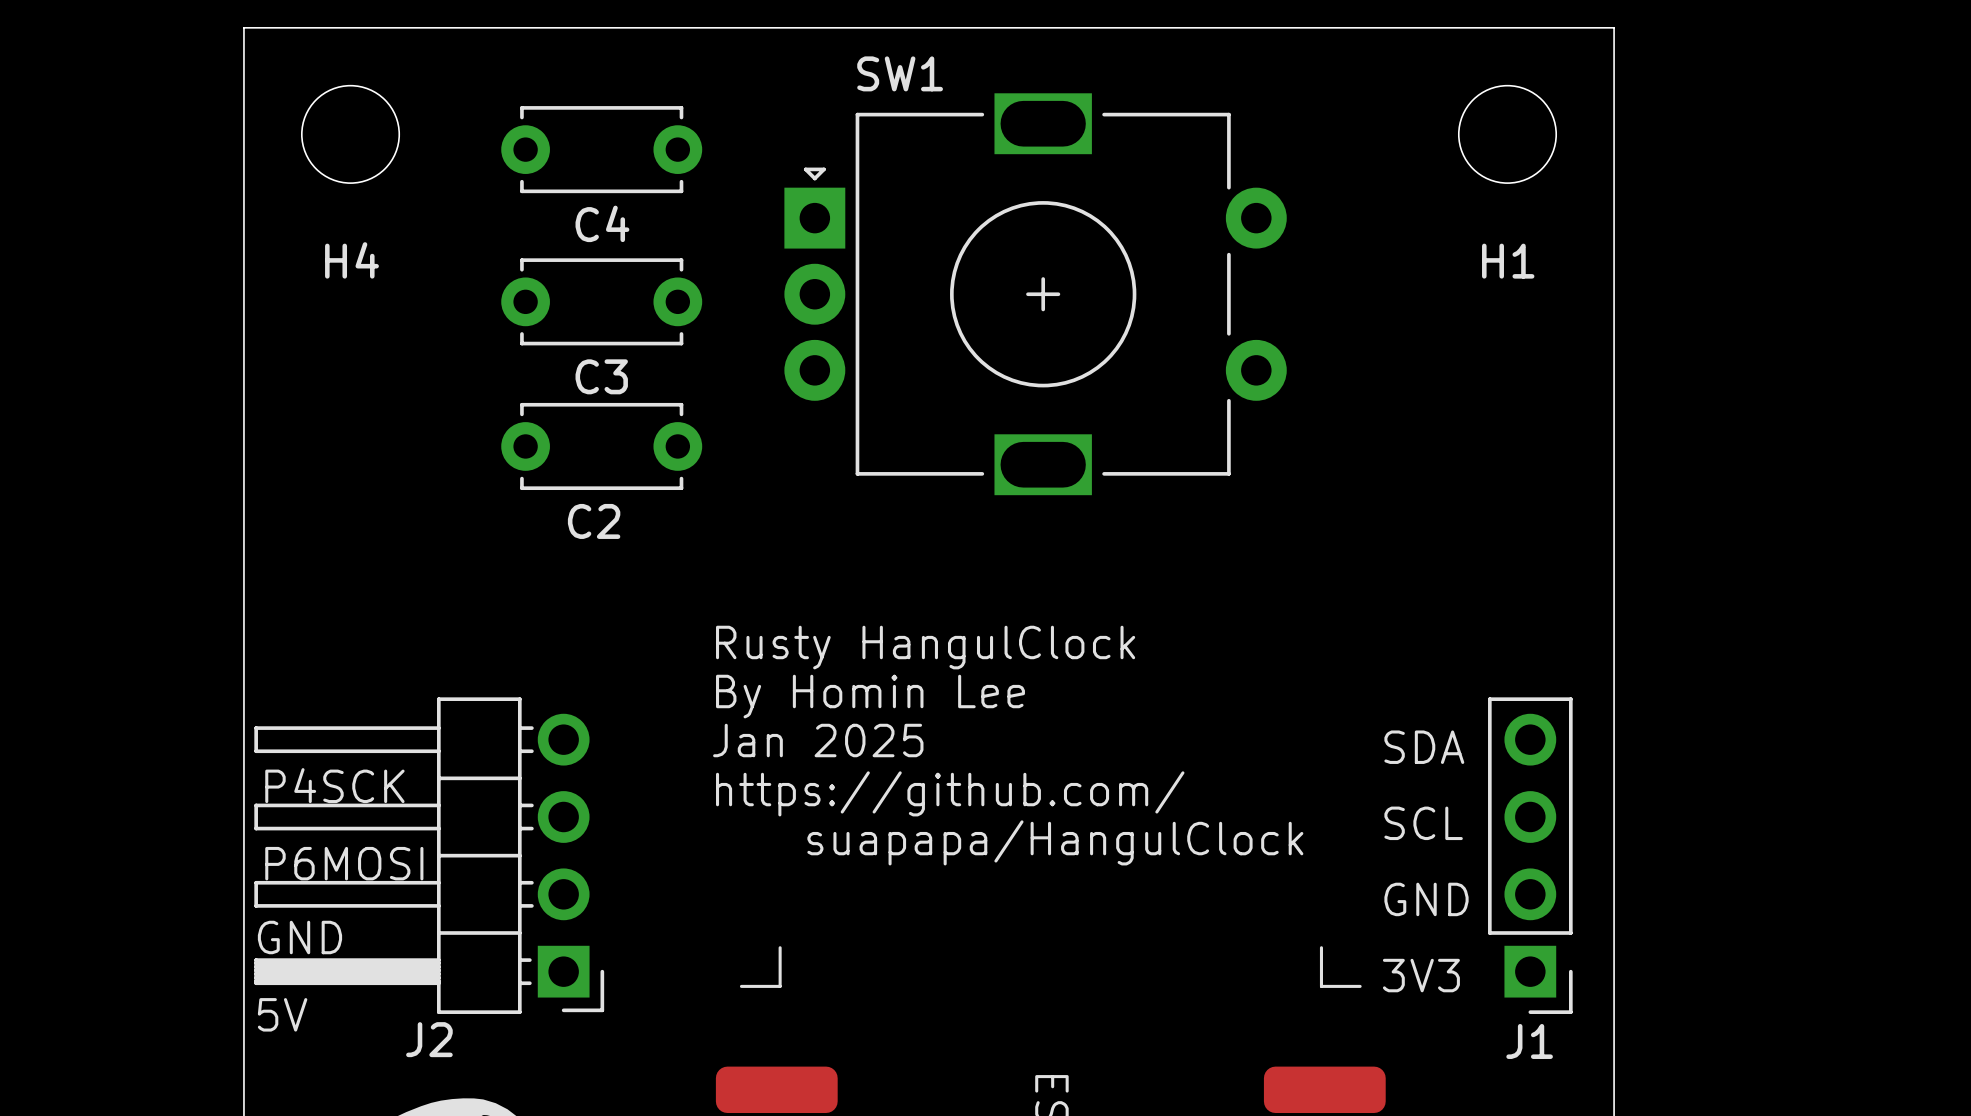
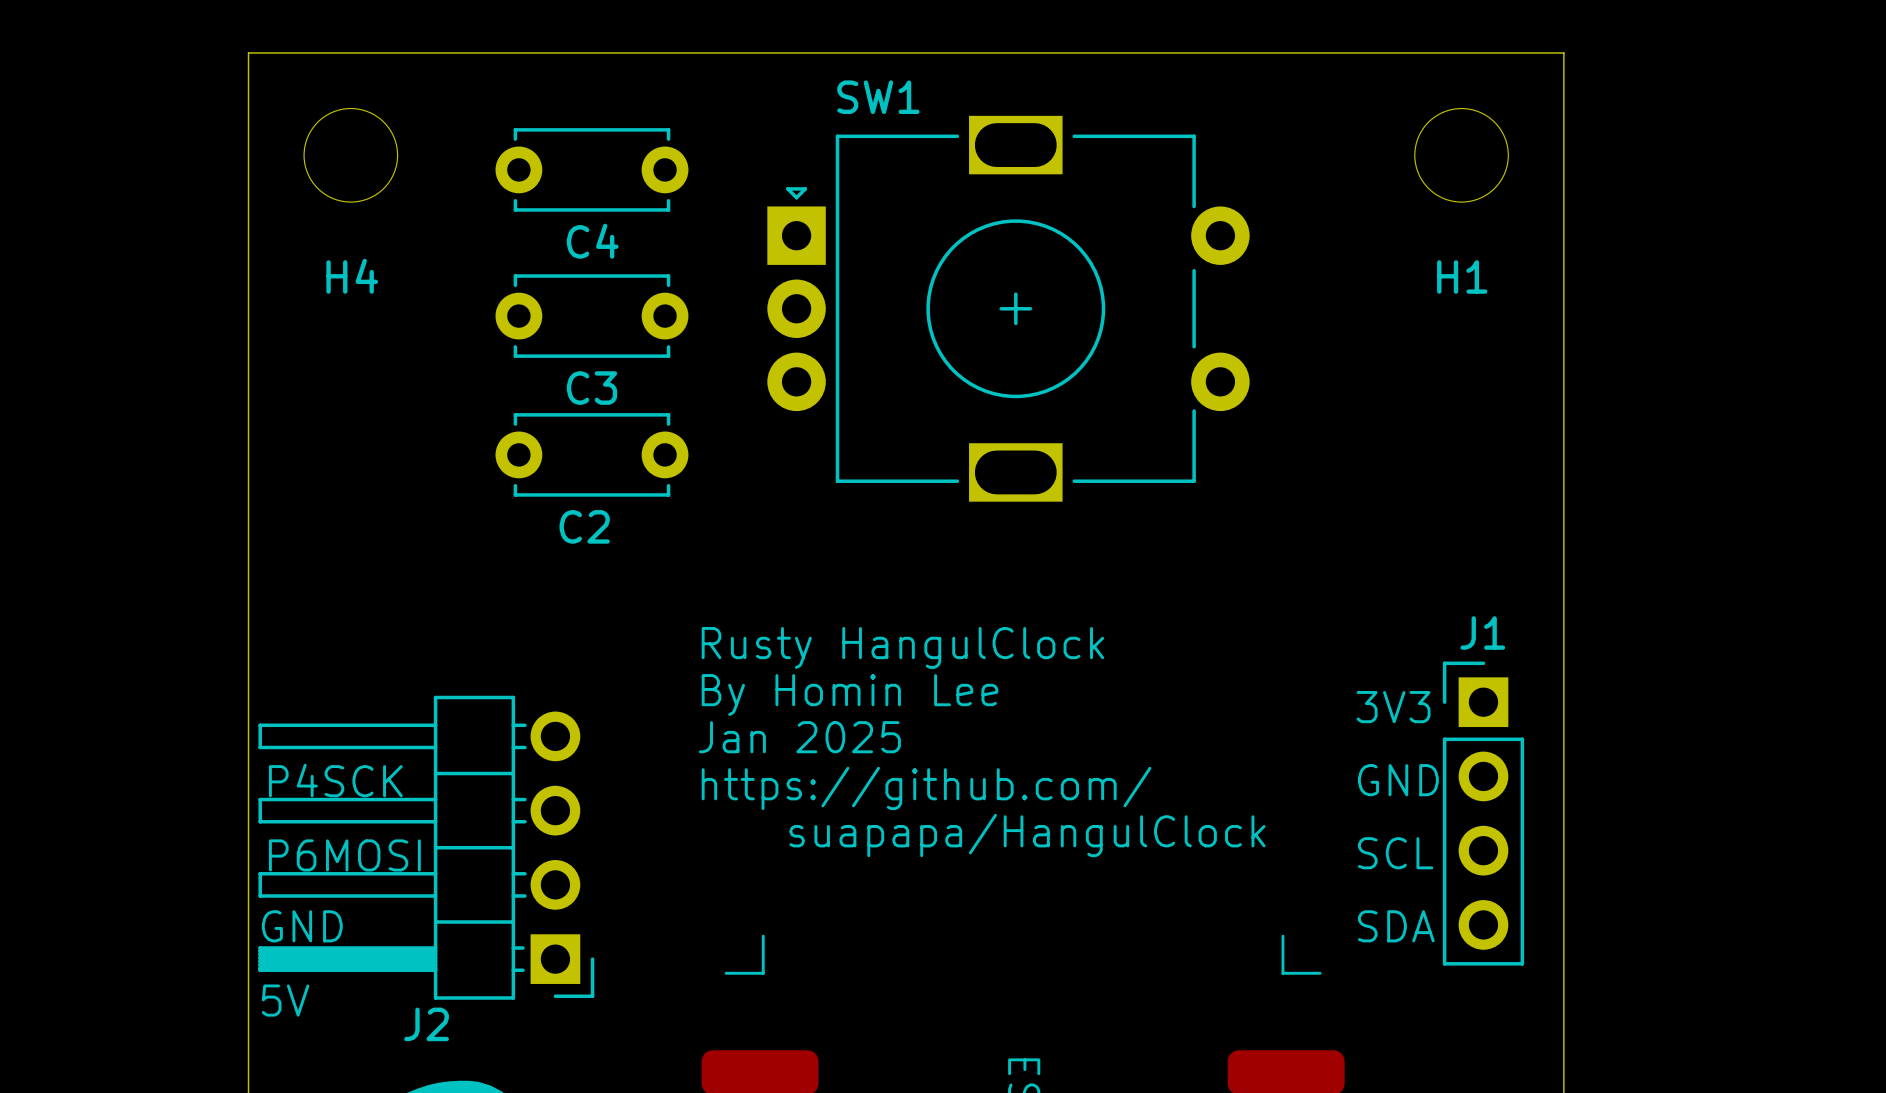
text position: SDA (1424, 747) -> SDA (1396, 926)
text position: SCL (1423, 823) -> SCL (1395, 853)
J1 rotation: 0° (1530, 855) -> 180° (1483, 813)
text position: GND (1426, 899) -> GND (1398, 780)
text position: 3V3 (1421, 975) -> 3V3 (1393, 707)

